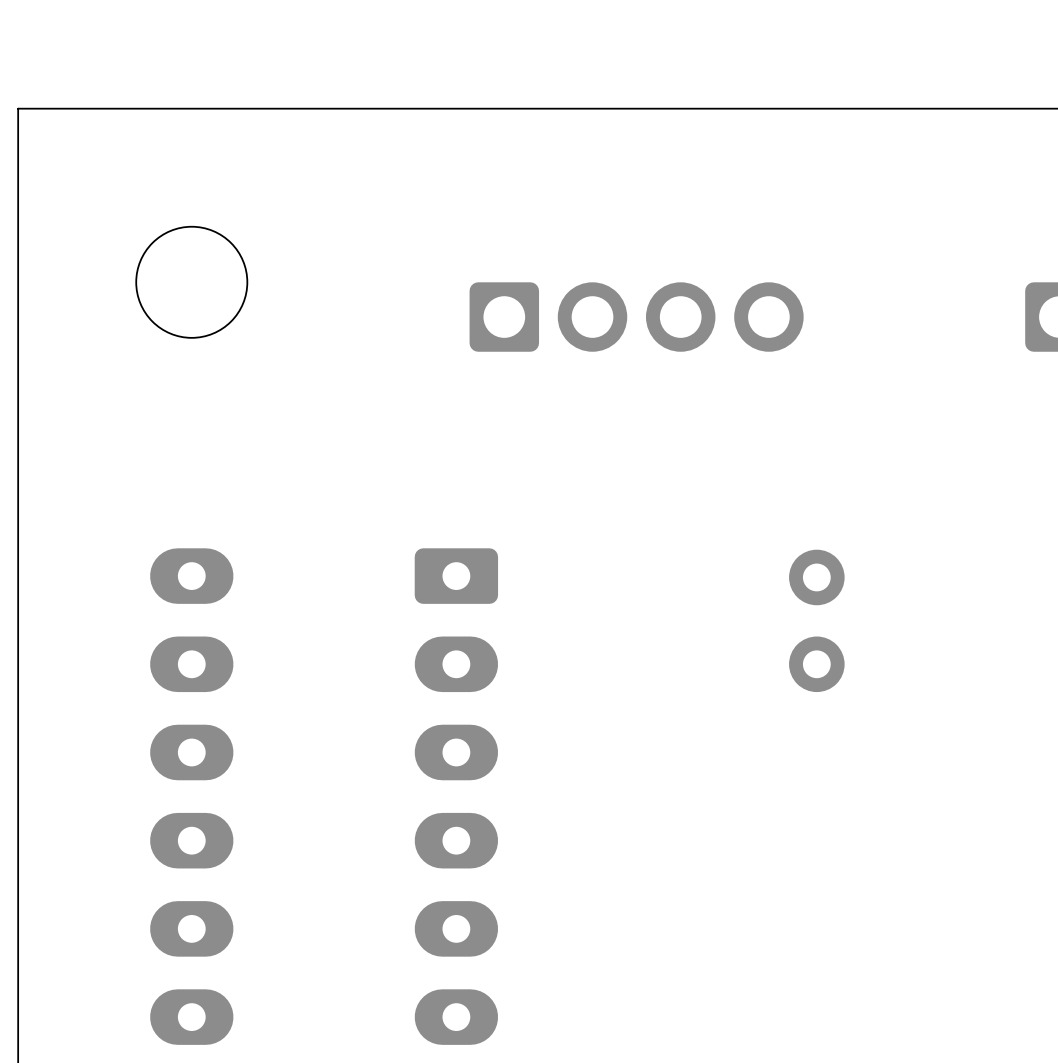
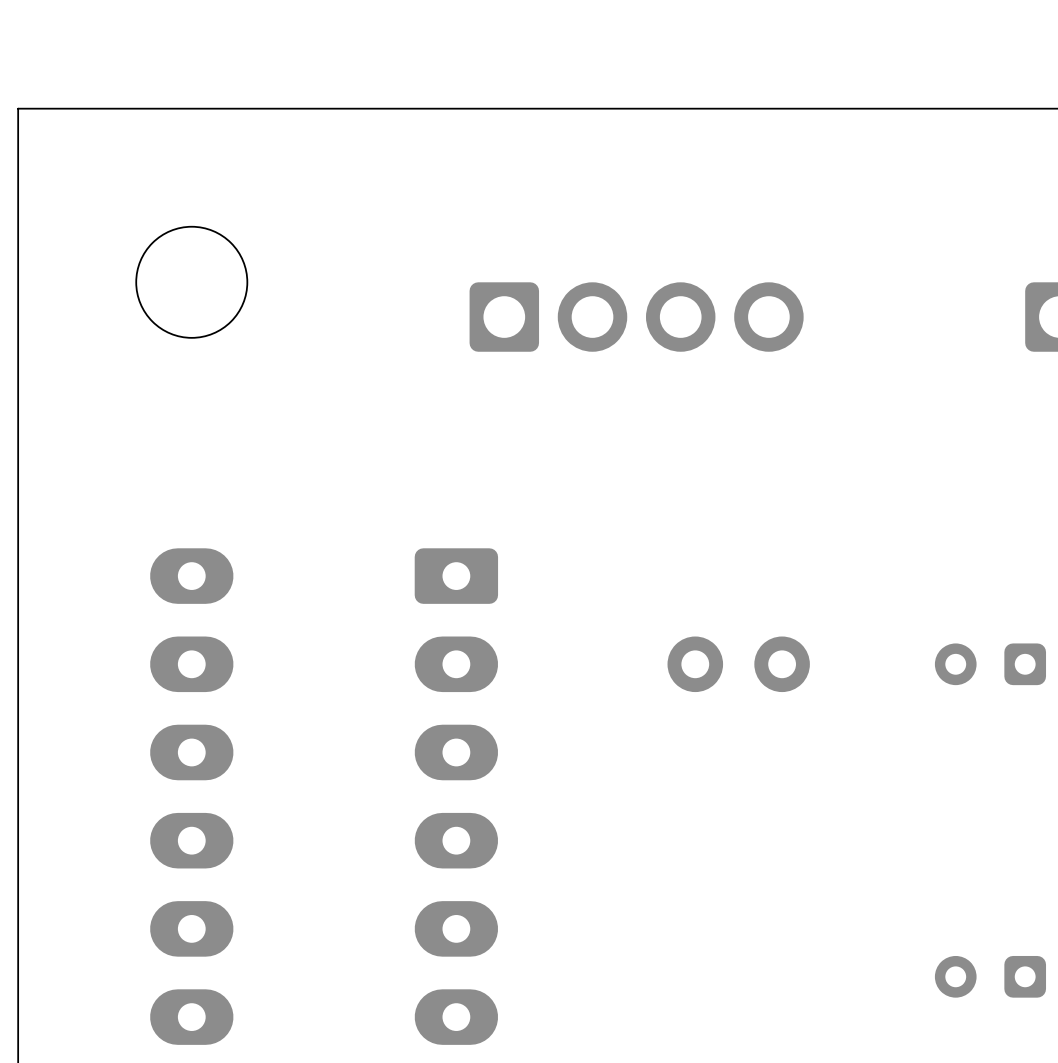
part rotation: 0° (816, 620) -> 90° clockwise (738, 664)
part position: (816, 620) -> (738, 664)
part: none -> (990, 664)
part: none -> (990, 976)

